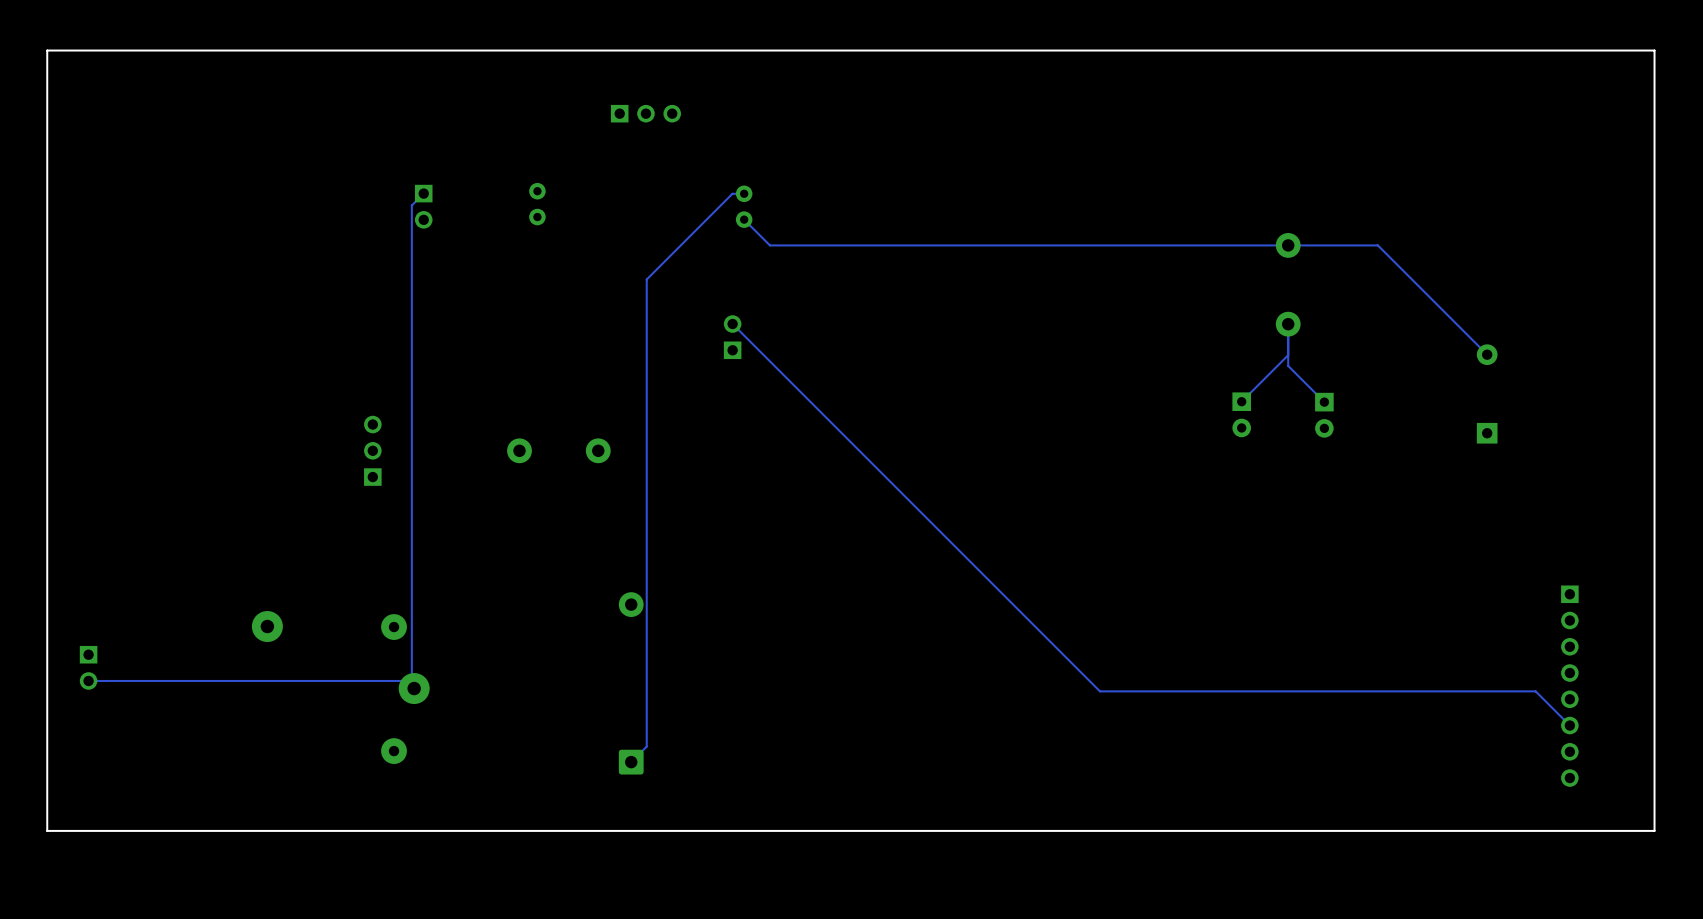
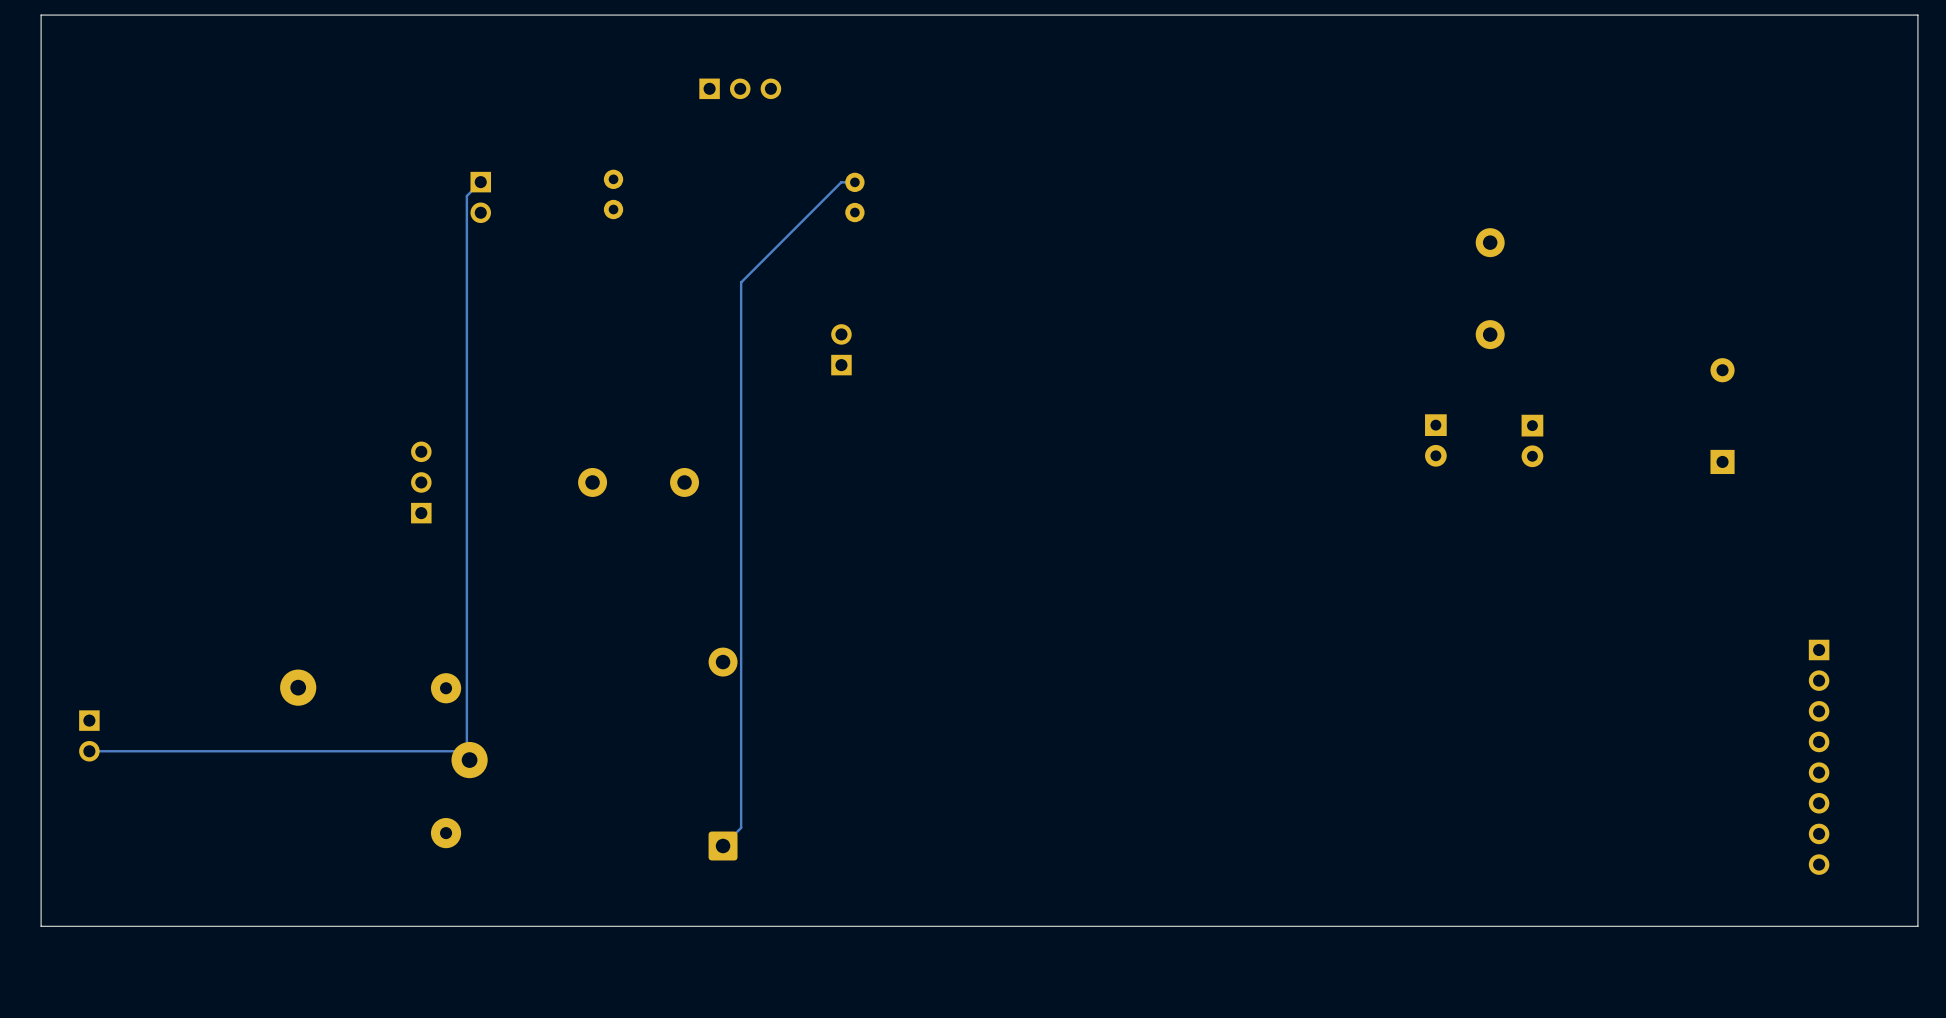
track: (744, 219) (769, 245) (1377, 245) (1481, 348) -> none
track: (732, 324) (1099, 691) (1535, 691) (1569, 725) -> none
track: (1288, 324) (1288, 365) (1324, 402) -> none
track: (1288, 355) (1241, 401) -> none

